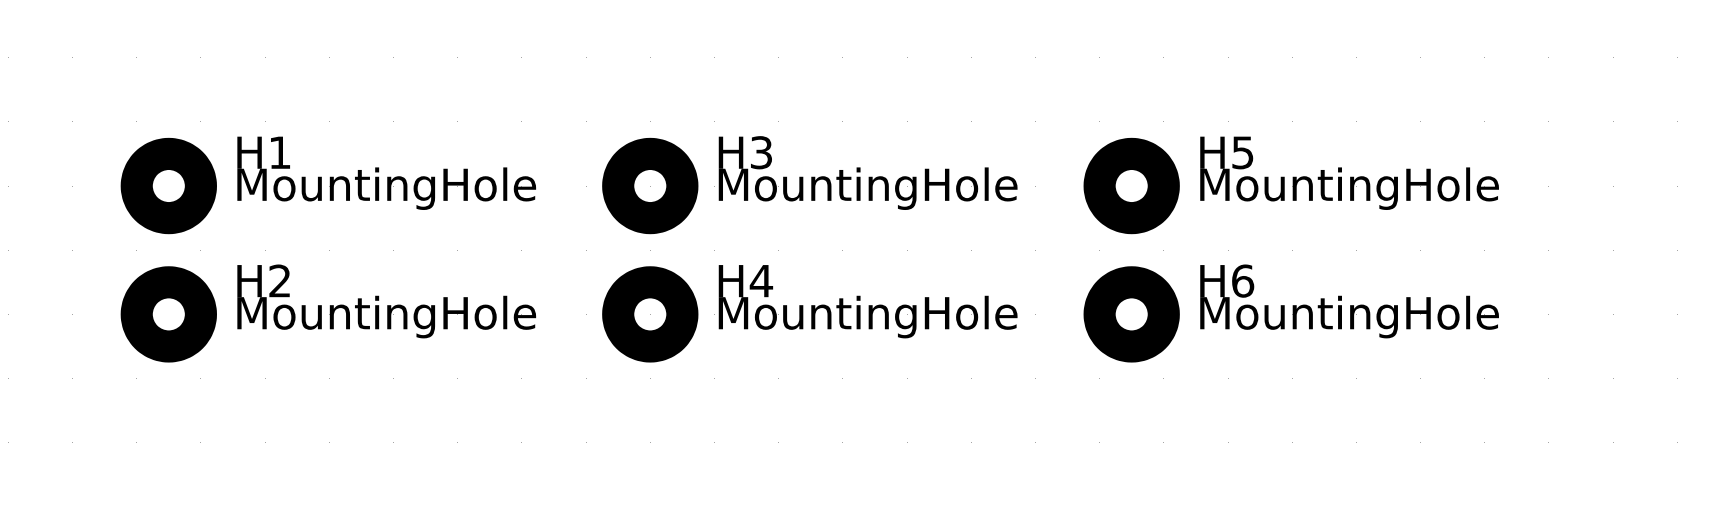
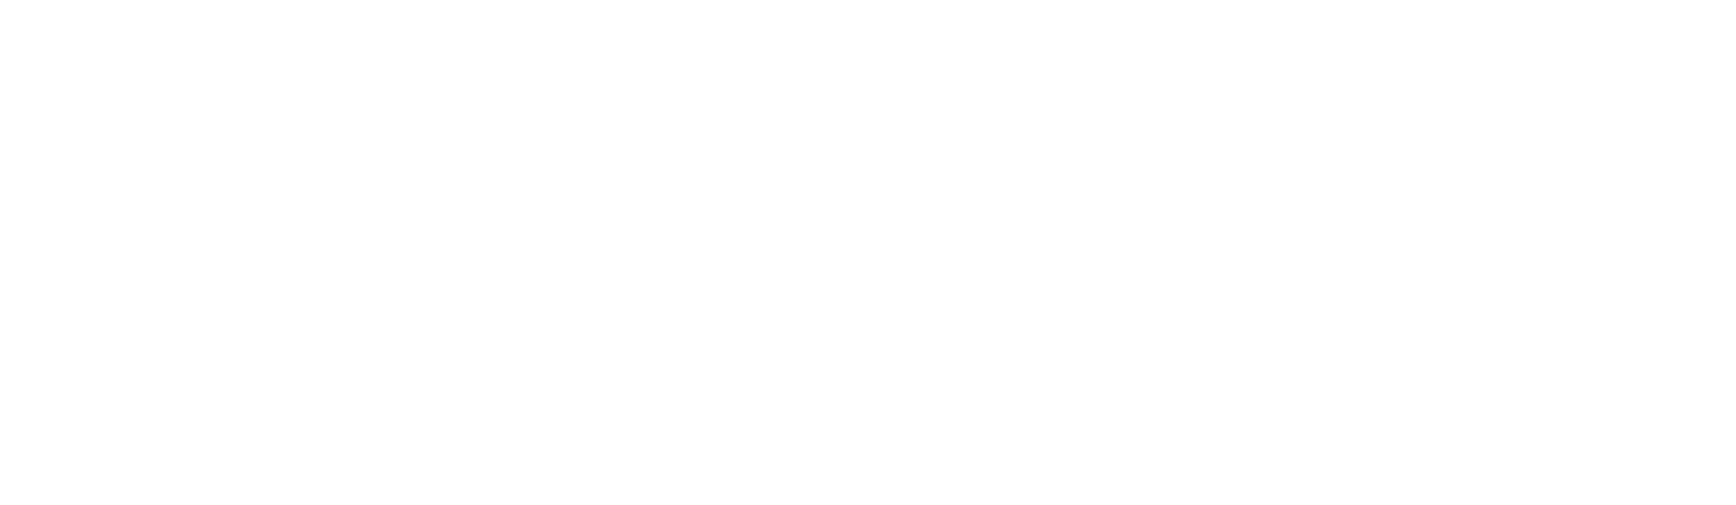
H1: MountingHole (168, 186) -> none
H3: MountingHole (650, 186) -> none
H5: MountingHole (1131, 186) -> none
H2: MountingHole (168, 314) -> none
H4: MountingHole (650, 314) -> none
H6: MountingHole (1131, 314) -> none

